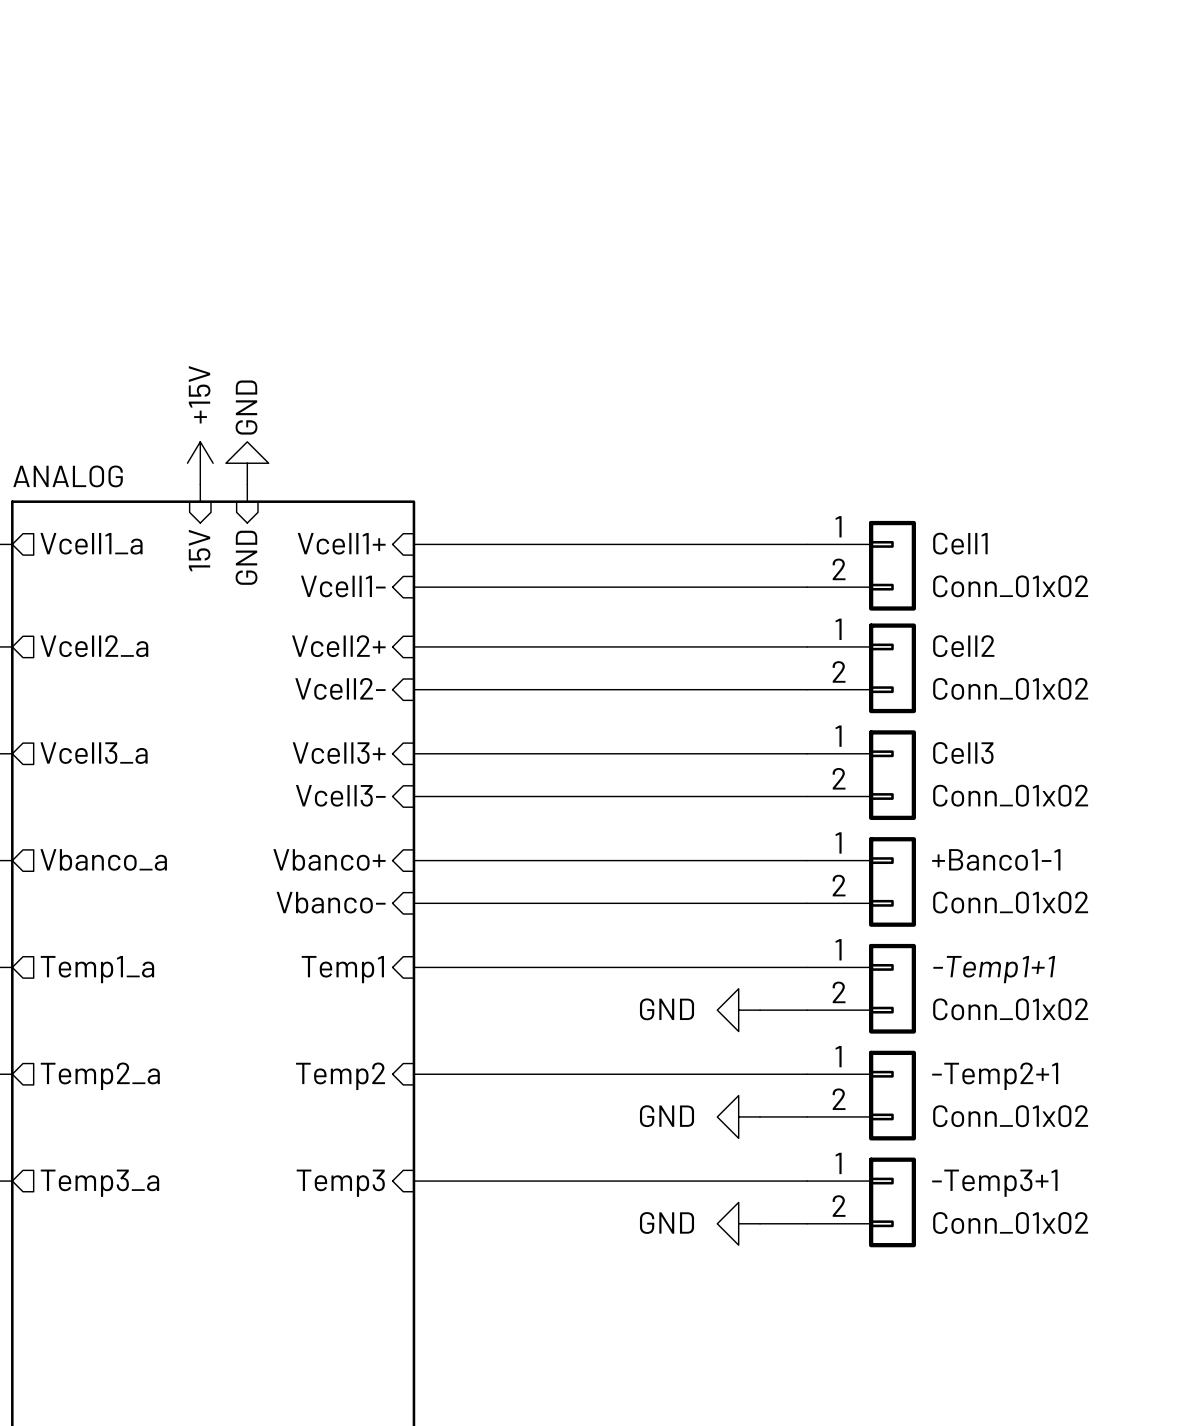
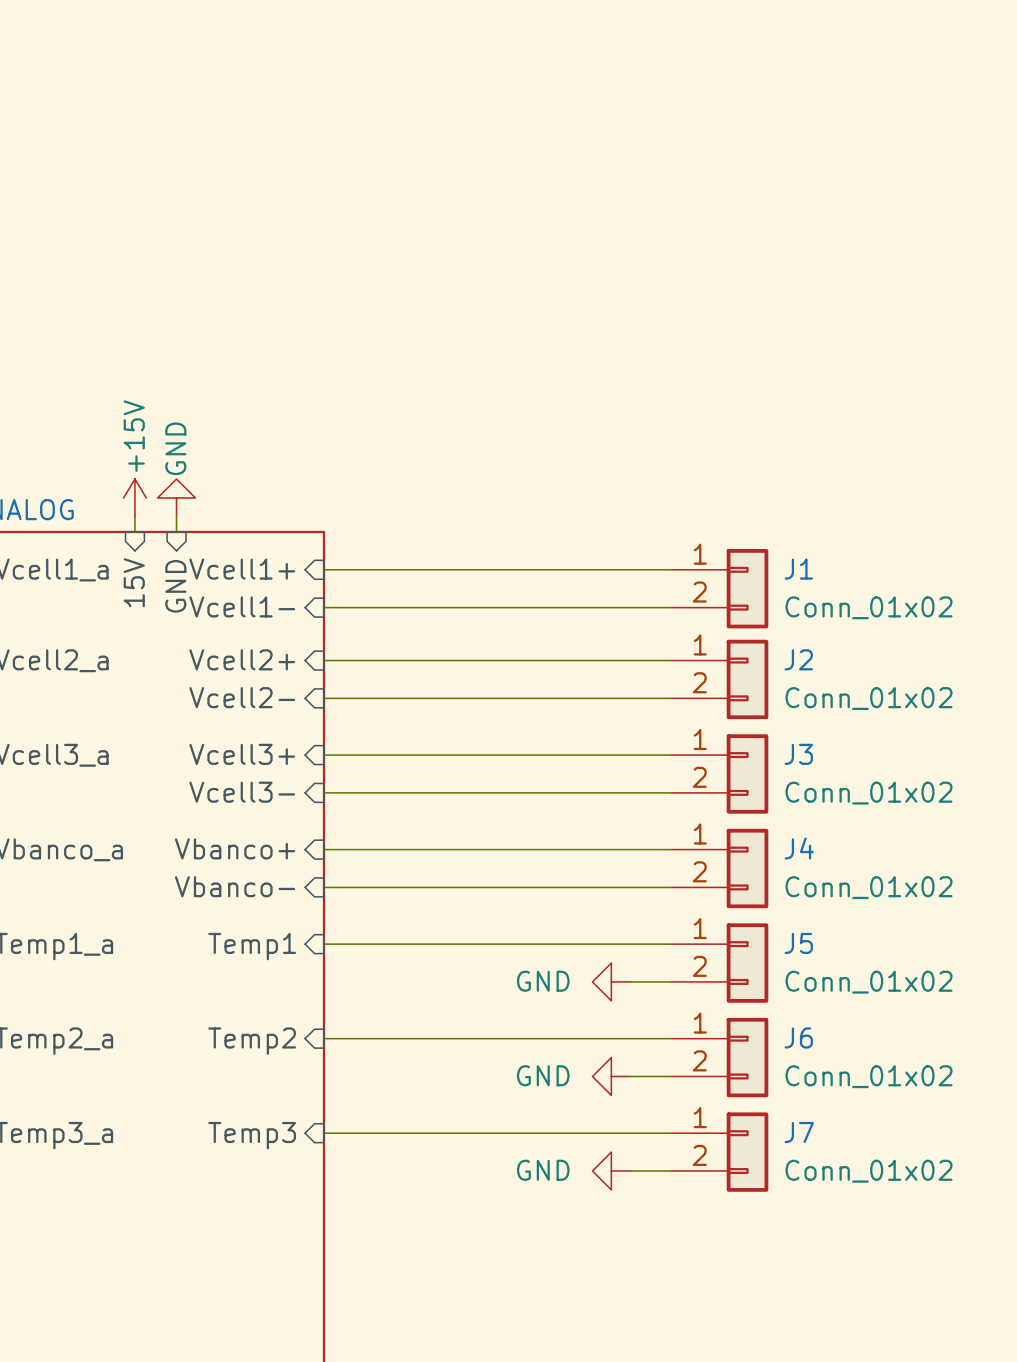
Cell1 name: Cell1 (960, 543) -> J1 (798, 569)
Cell2 name: Cell2 (963, 646) -> J2 (798, 659)
Cell3 name: Cell3 (963, 752) -> J3 (798, 754)
+Banco1-1 name: +Banco1-1 (996, 859) -> J4 (799, 848)
-Temp1+1 name: -Temp1+1 (994, 969) -> J5 (798, 943)
-Temp2+1 name: -Temp2+1 (995, 1076) -> J6 (798, 1037)
-Temp3+1 name: -Temp3+1 (994, 1183) -> J7 (799, 1132)

